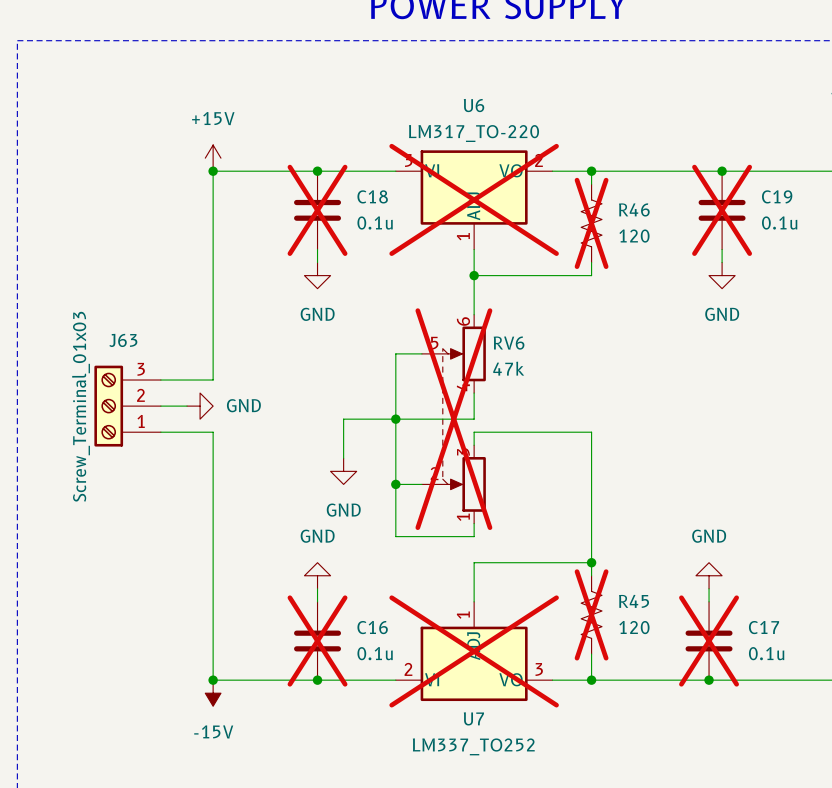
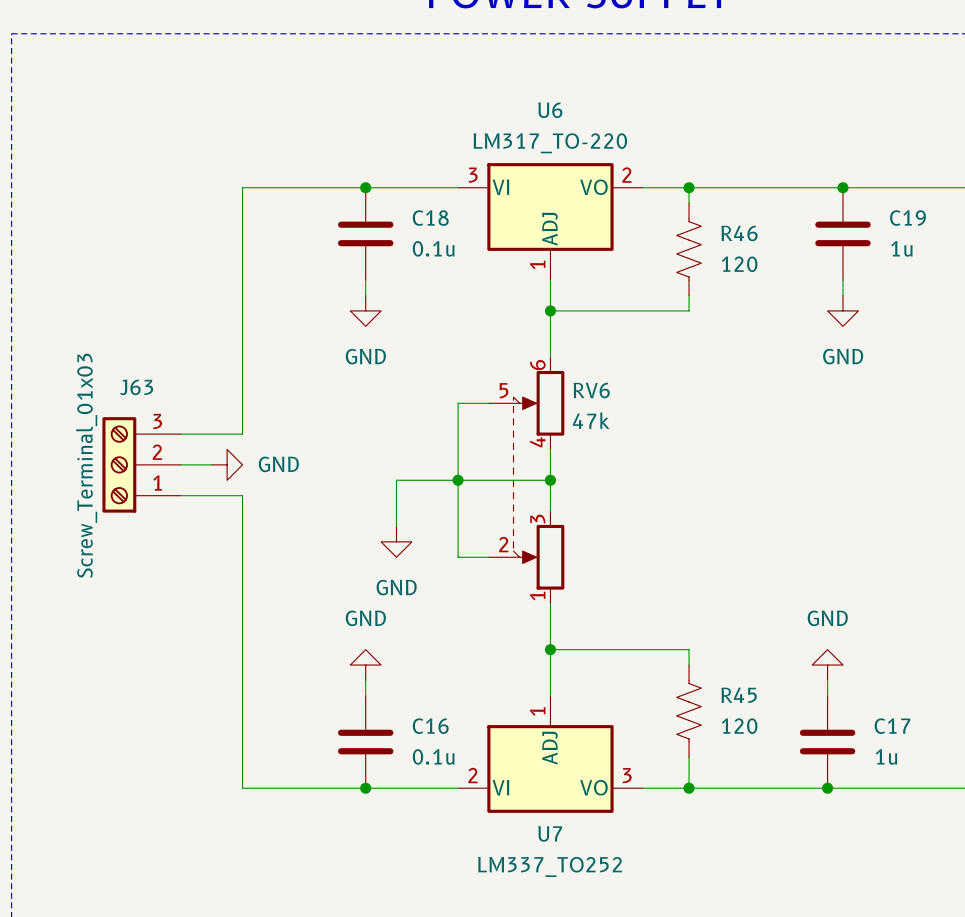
power symbol: +15V (213, 158) -> none
junction: (213, 171) -> none
U6 do-not-place cross: (474, 199) -> none
C18 do-not-place cross: (317, 210) -> none
C19 do-not-place cross: (722, 210) -> none
C19 value: 0.1u (779, 222) -> 1u (901, 248)
R46 do-not-place cross: (591, 223) -> none
RV6 do-not-place cross: (453, 419) -> none
junction: none -> (550, 480)
wire: (474, 432) (591, 432) (591, 562) -> (550, 495) (550, 480)
wire: (395, 484) (395, 536) (474, 536) -> (550, 649) (550, 618)
junction: (395, 484) -> none
junction: none -> (550, 649)
junction: (591, 562) -> none
R45 do-not-place cross: (591, 614) -> none
C16 do-not-place cross: (317, 641) -> none
C17 do-not-place cross: (709, 641) -> none
U7 do-not-place cross: (474, 651) -> none
C17 value: 0.1u (766, 653) -> 1u (886, 756)
junction: (213, 680) -> none
power symbol: -15V (213, 693) -> none

